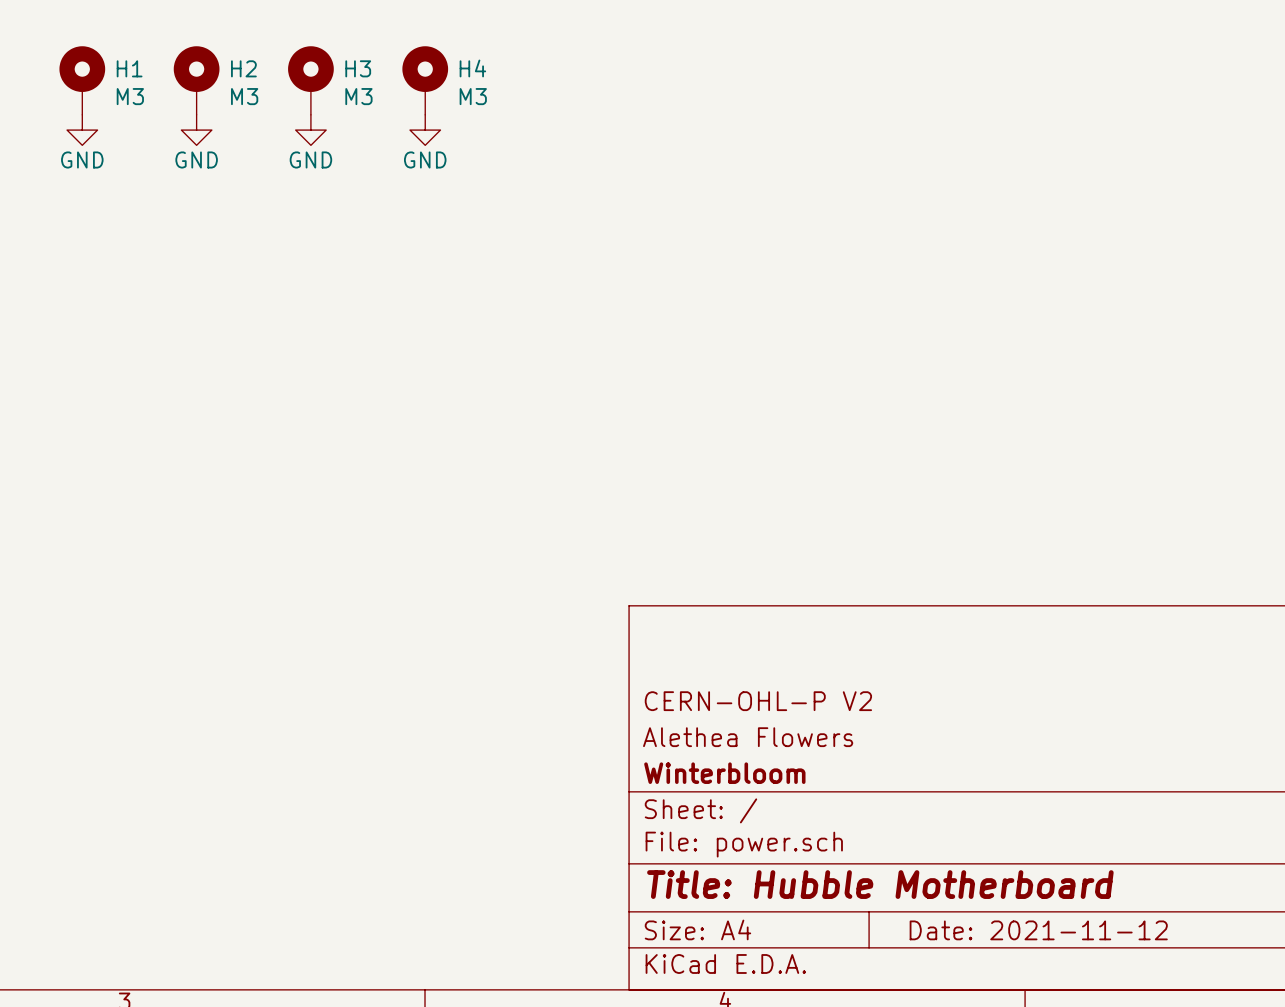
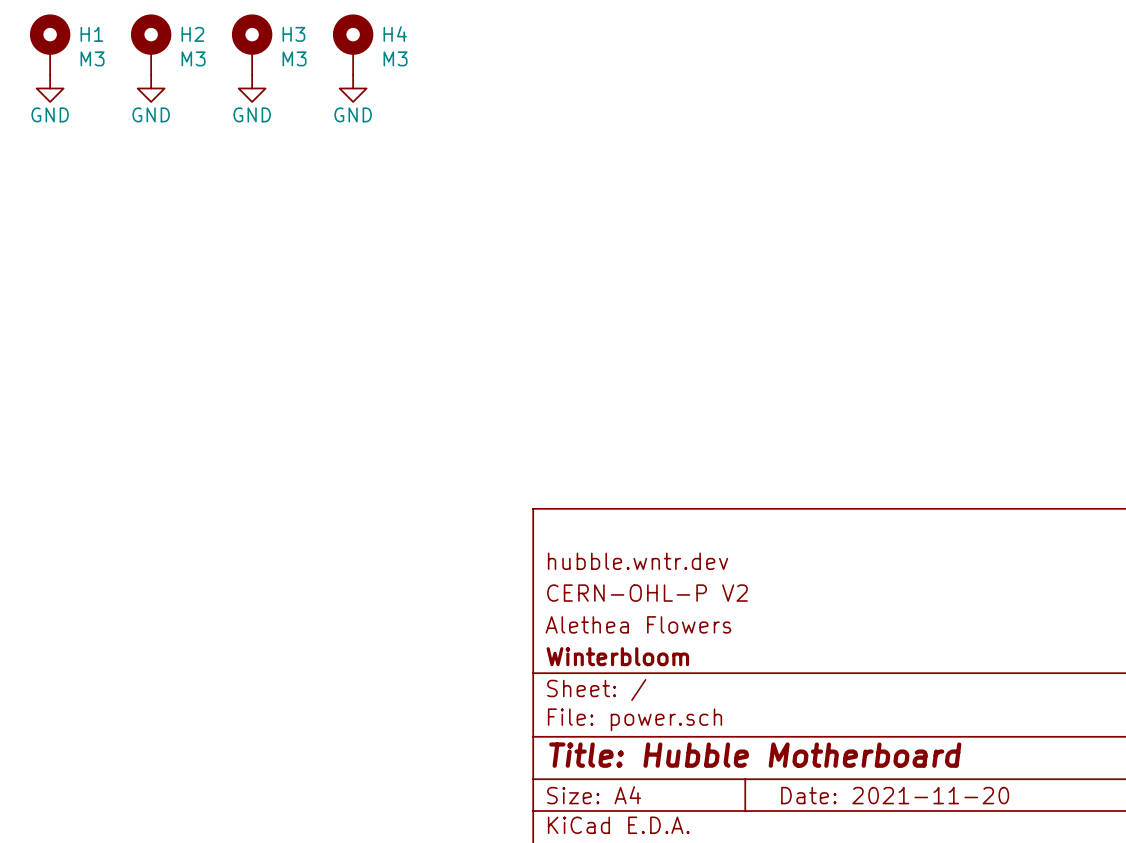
title block: none -> hubble.wntr.dev (638, 561)
title block: Date: 2021-11-12 (1038, 930) -> Date: 2021-11-20 (895, 795)

